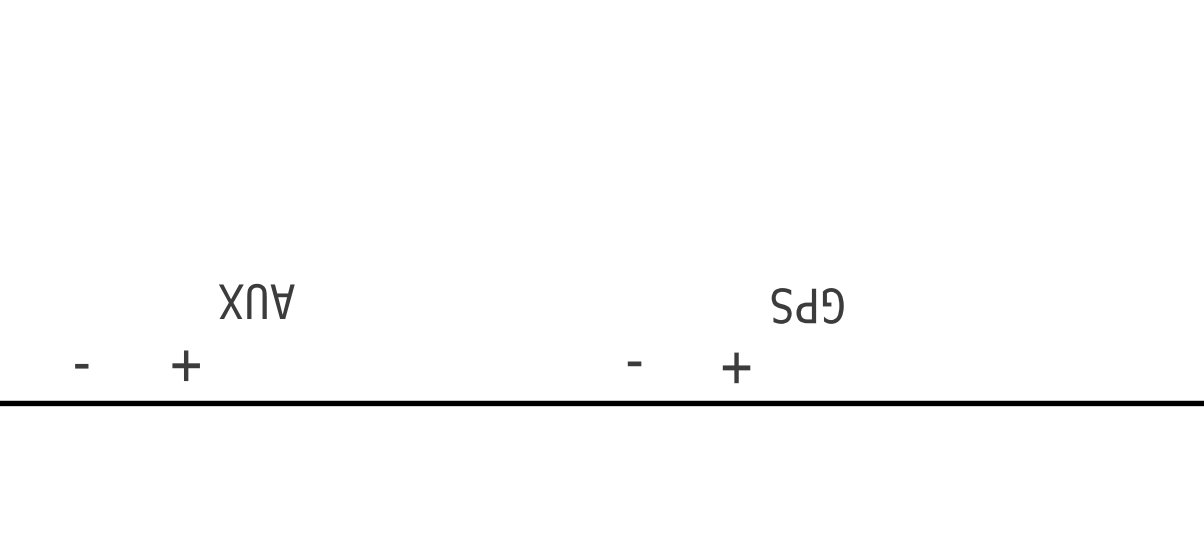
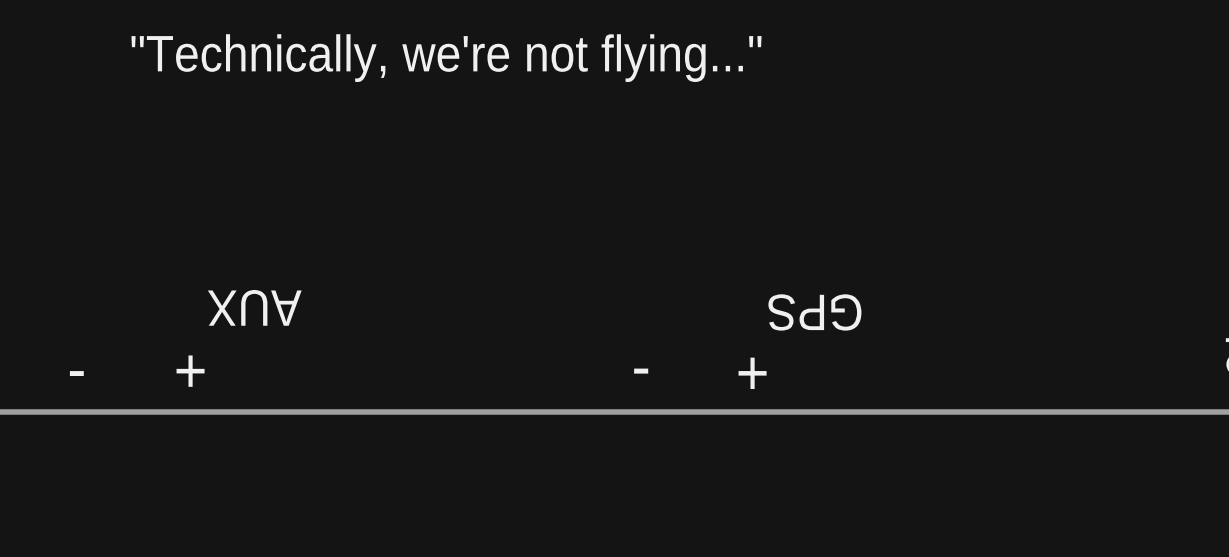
text: none -> "Technically, we're not flying..." (446, 58)

